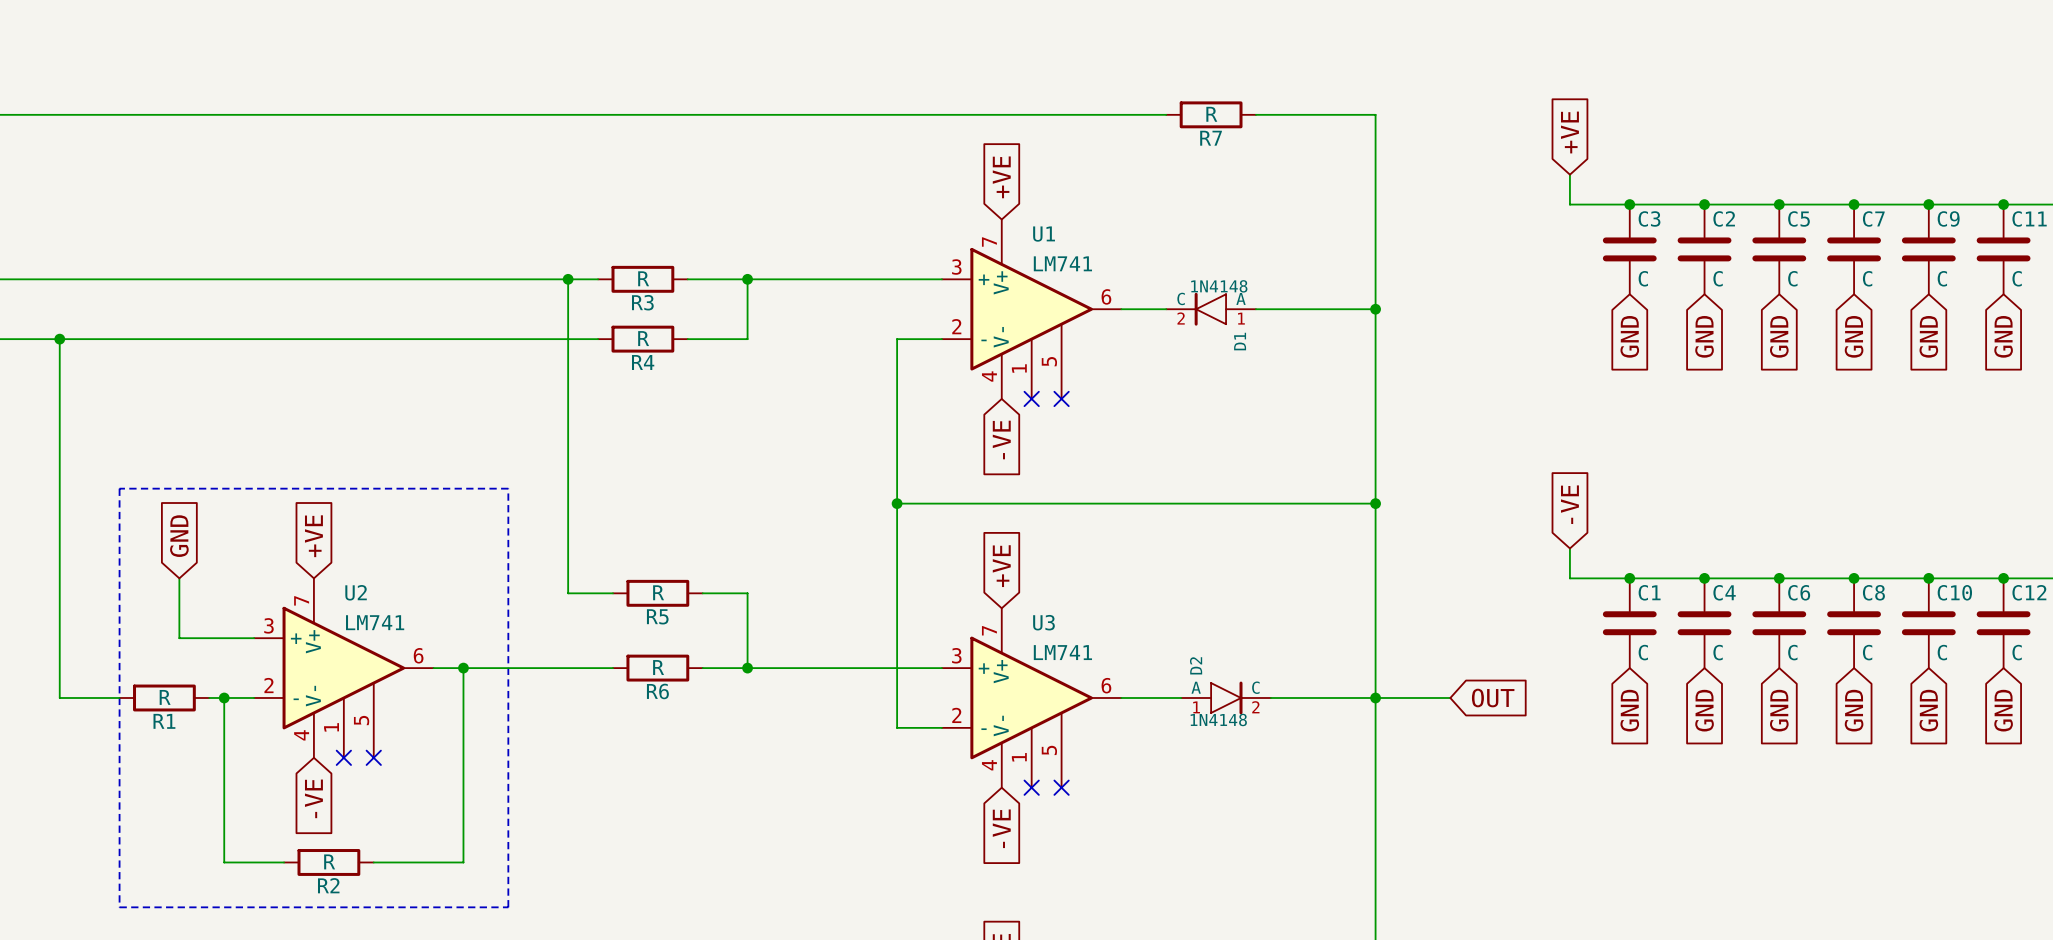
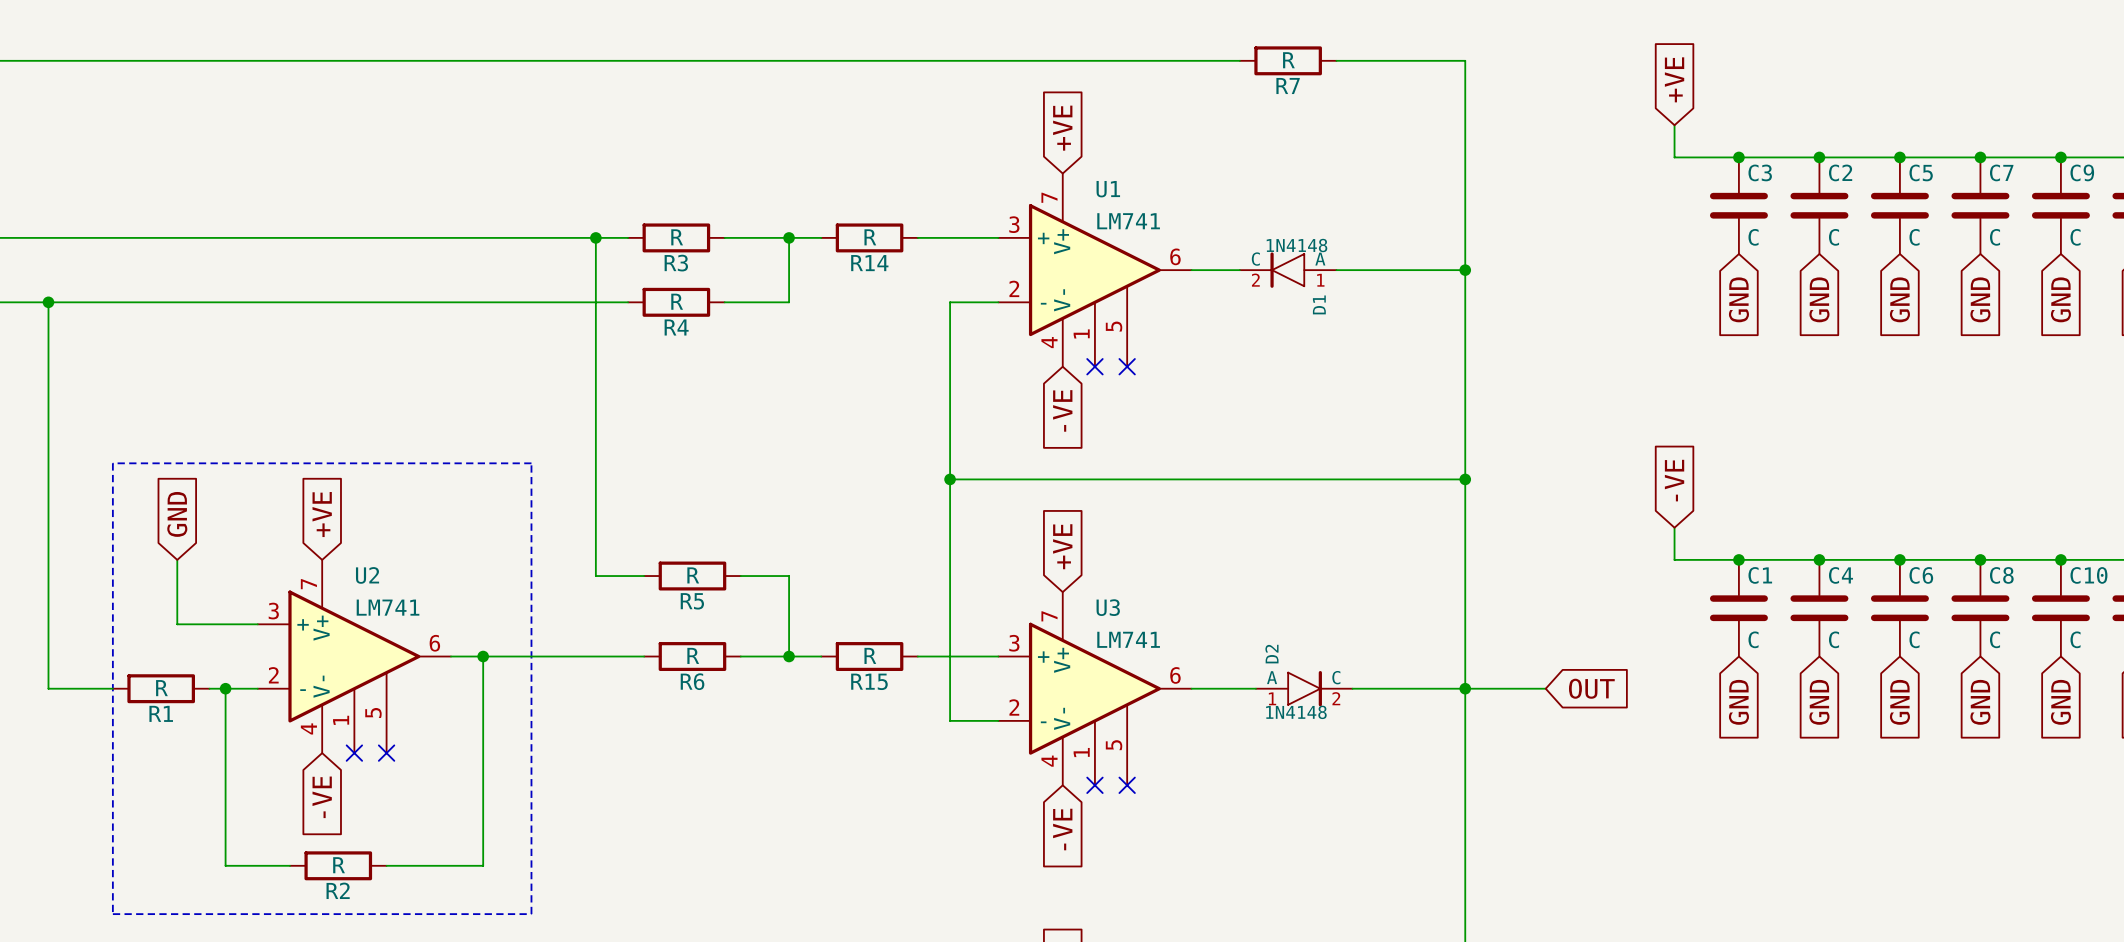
wire: (777, 279) (867, 279) -> none
R14: none -> R (869, 237)
wire: (777, 668) (867, 668) -> none
R15: none -> R (869, 656)

